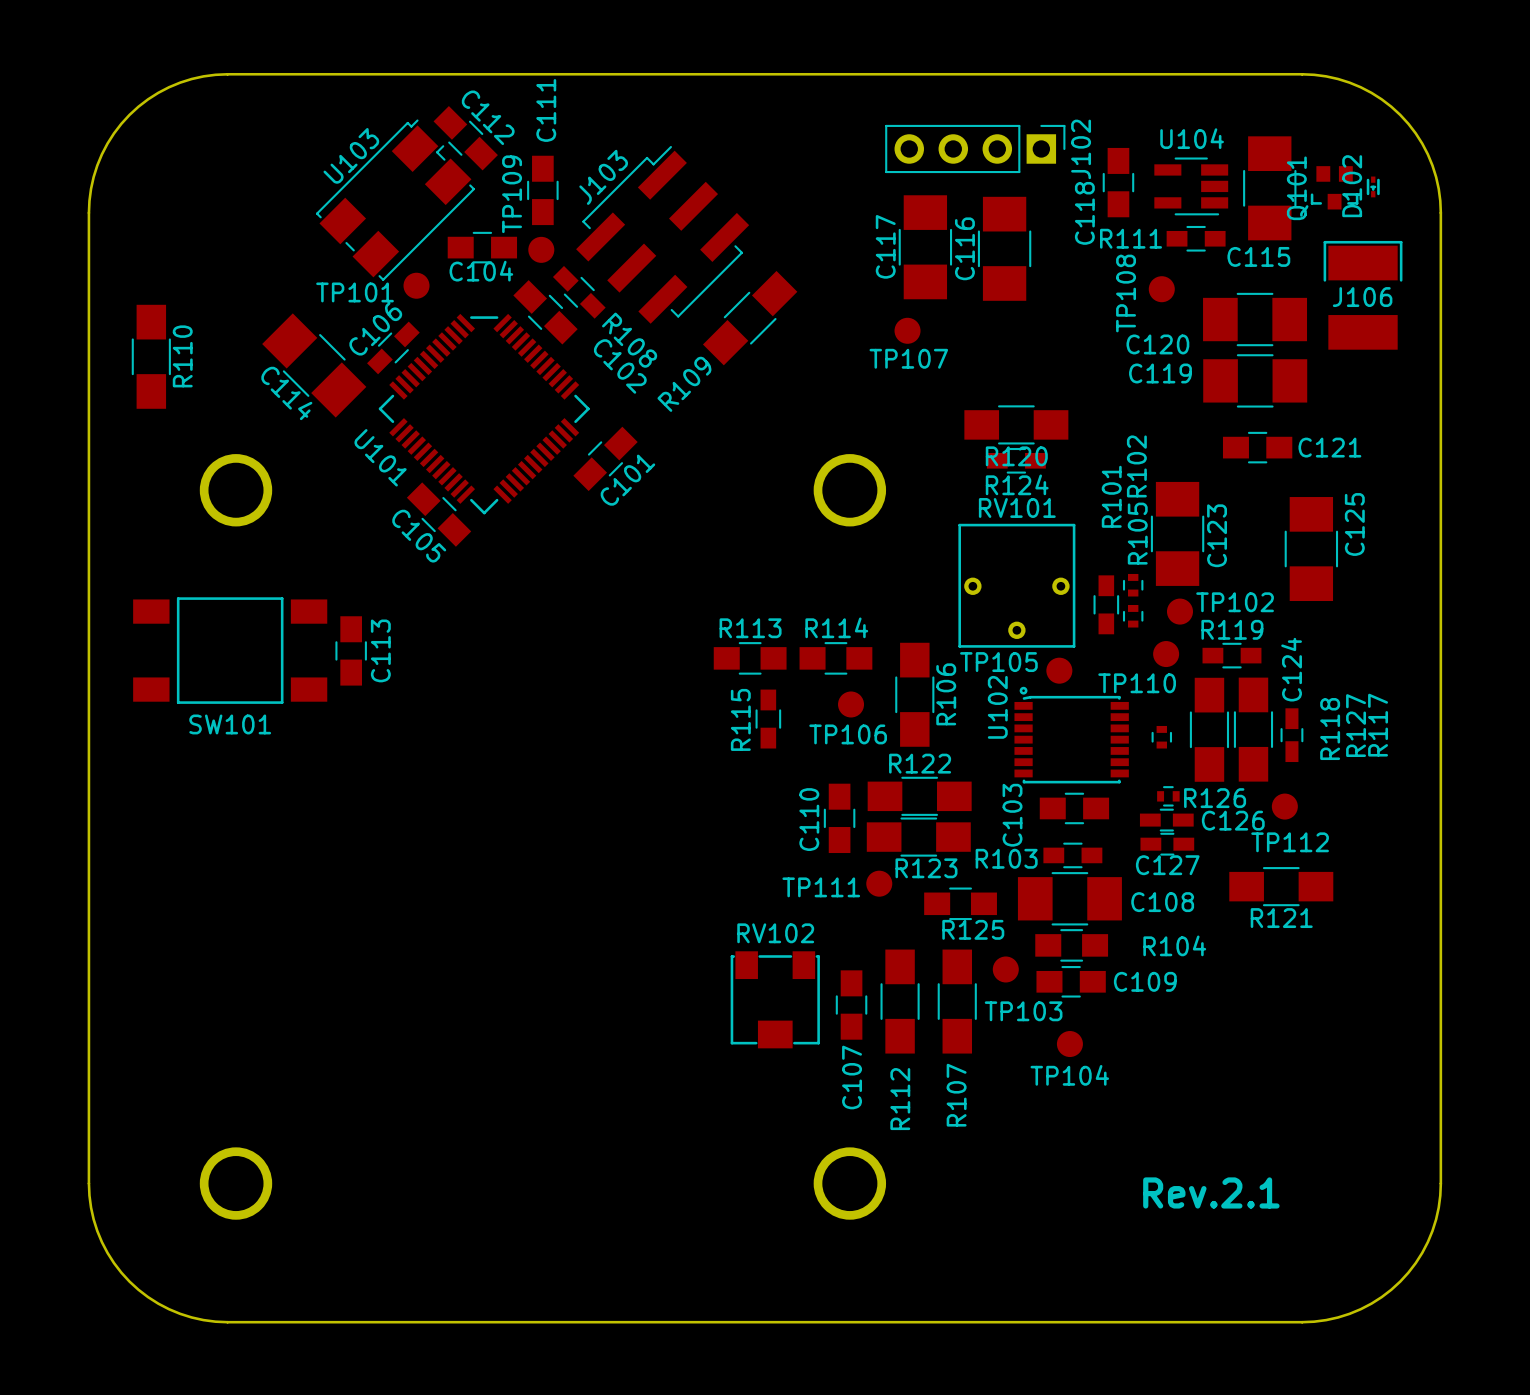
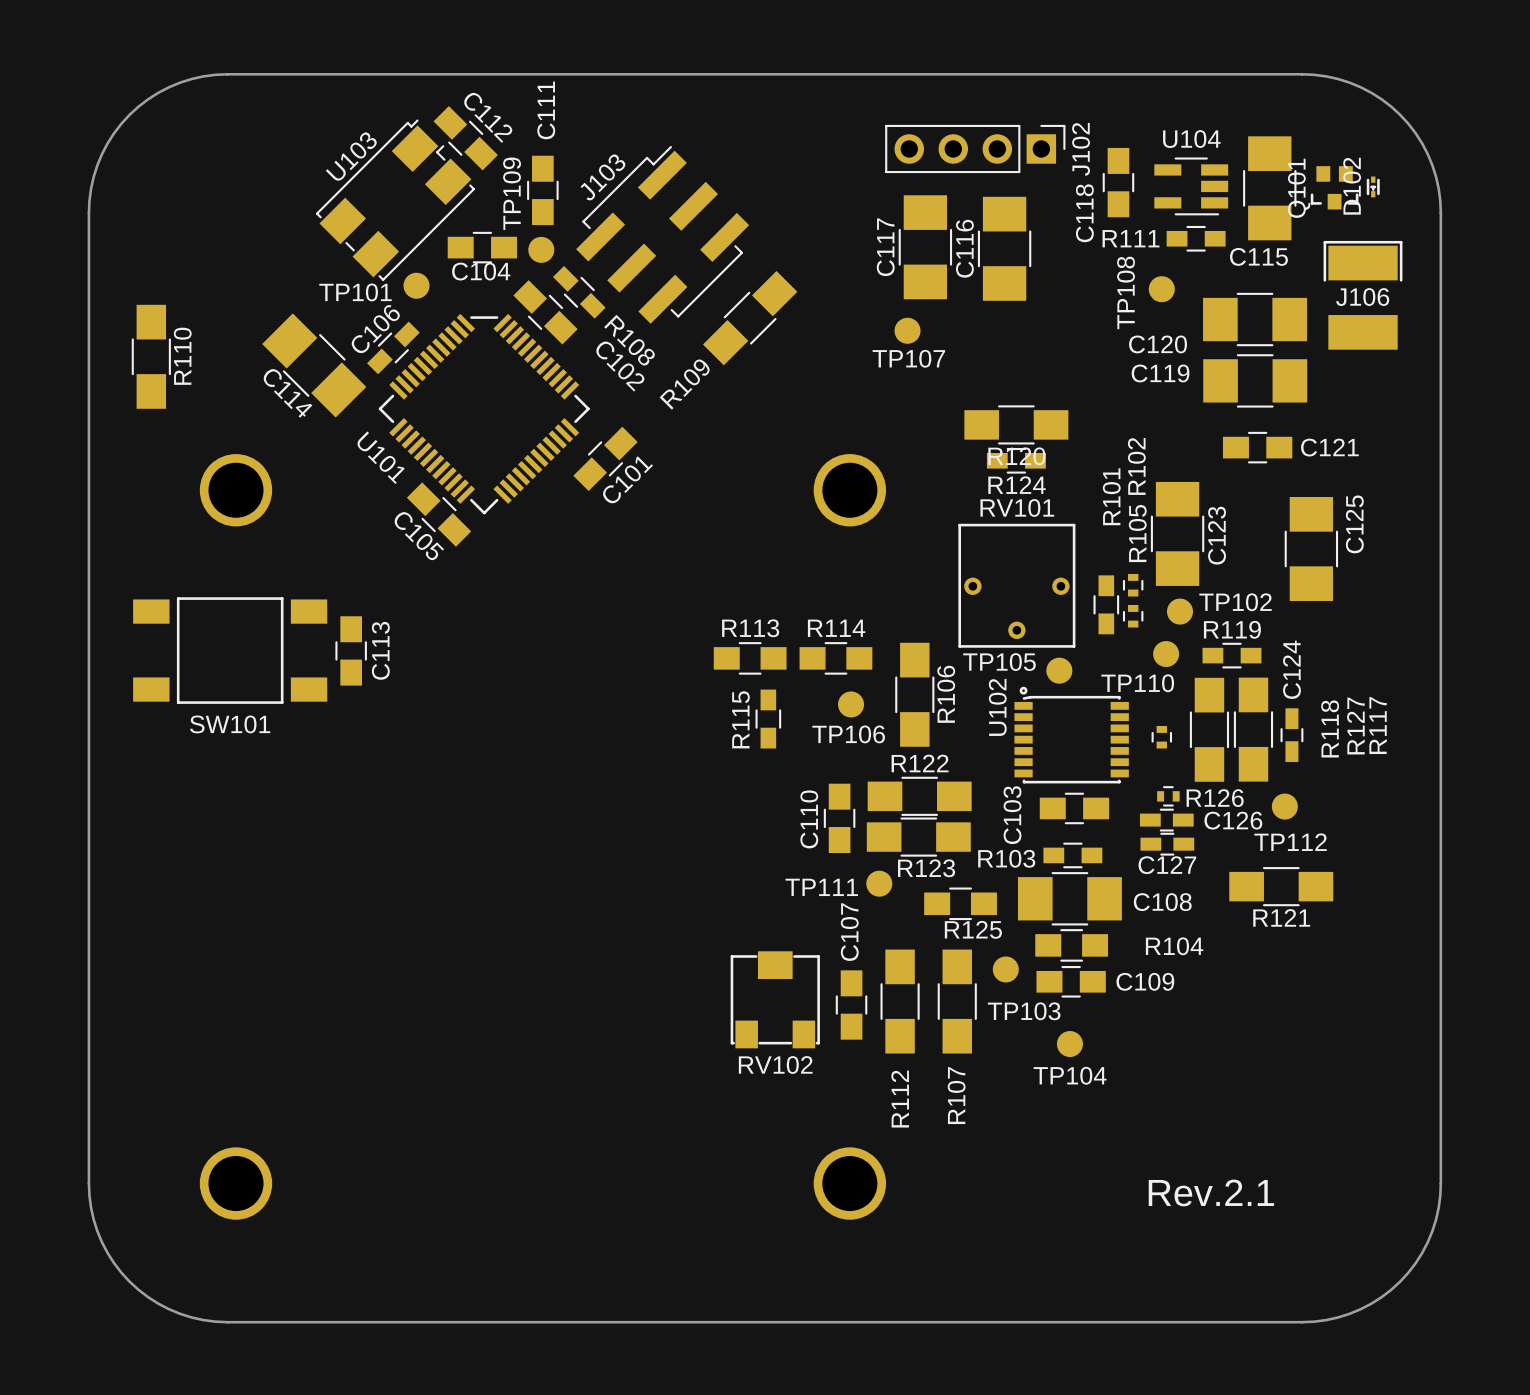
RV102 rotation: 0° (775, 999) -> 180° (775, 999)
C107 name position: C107 (852, 1077) -> C107 (849, 932)

